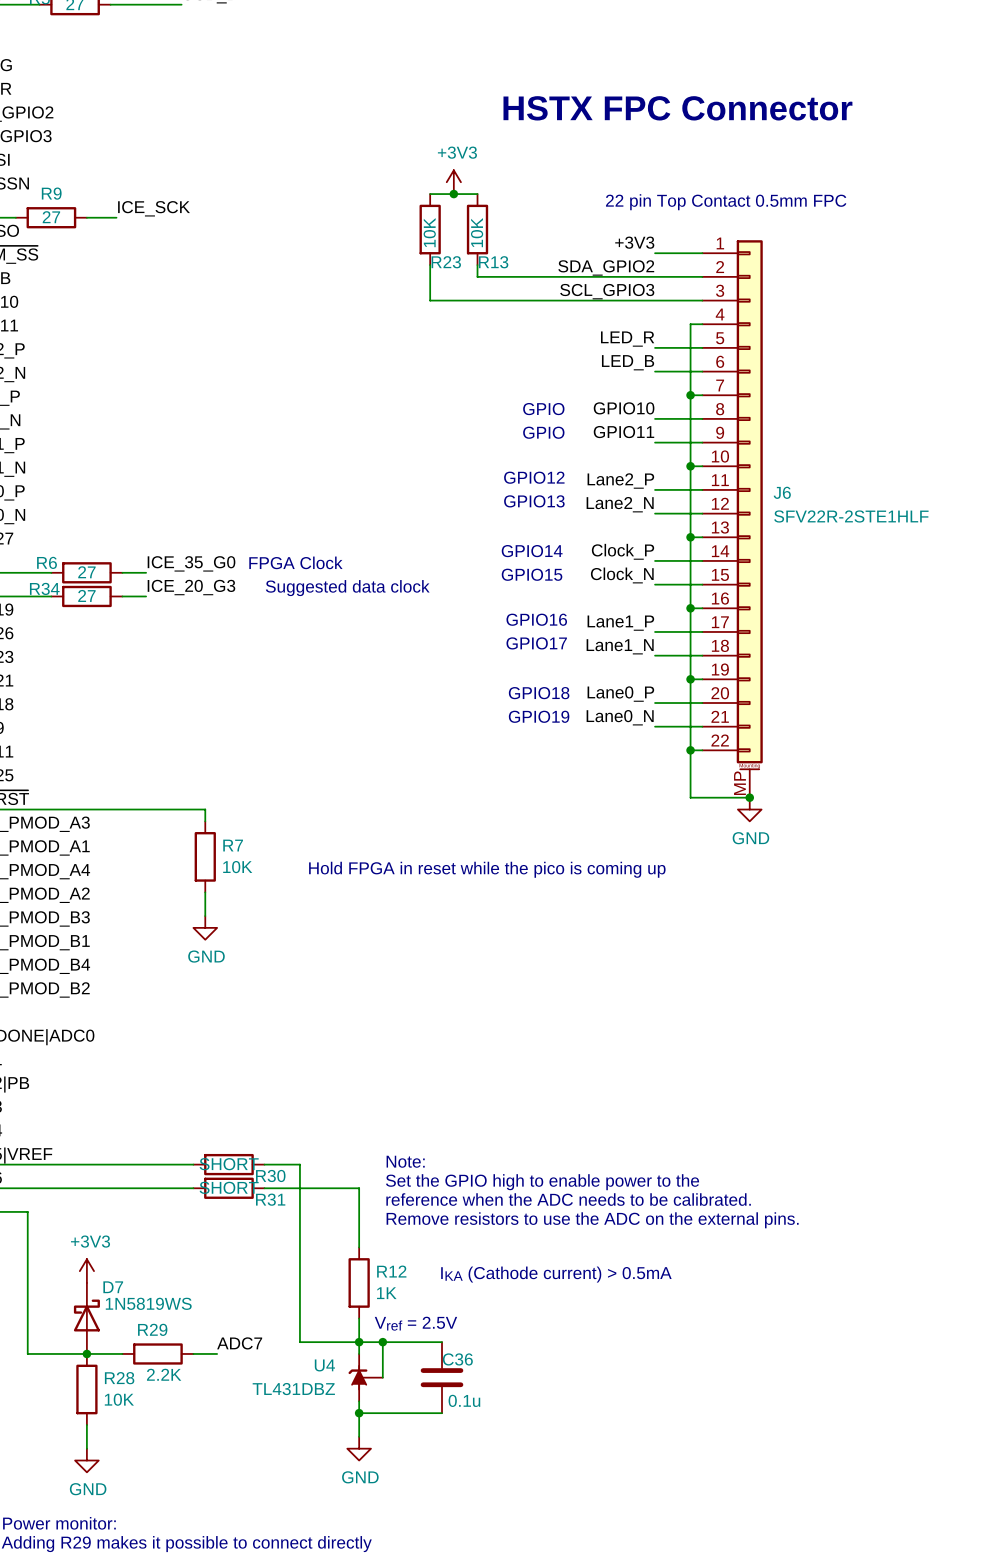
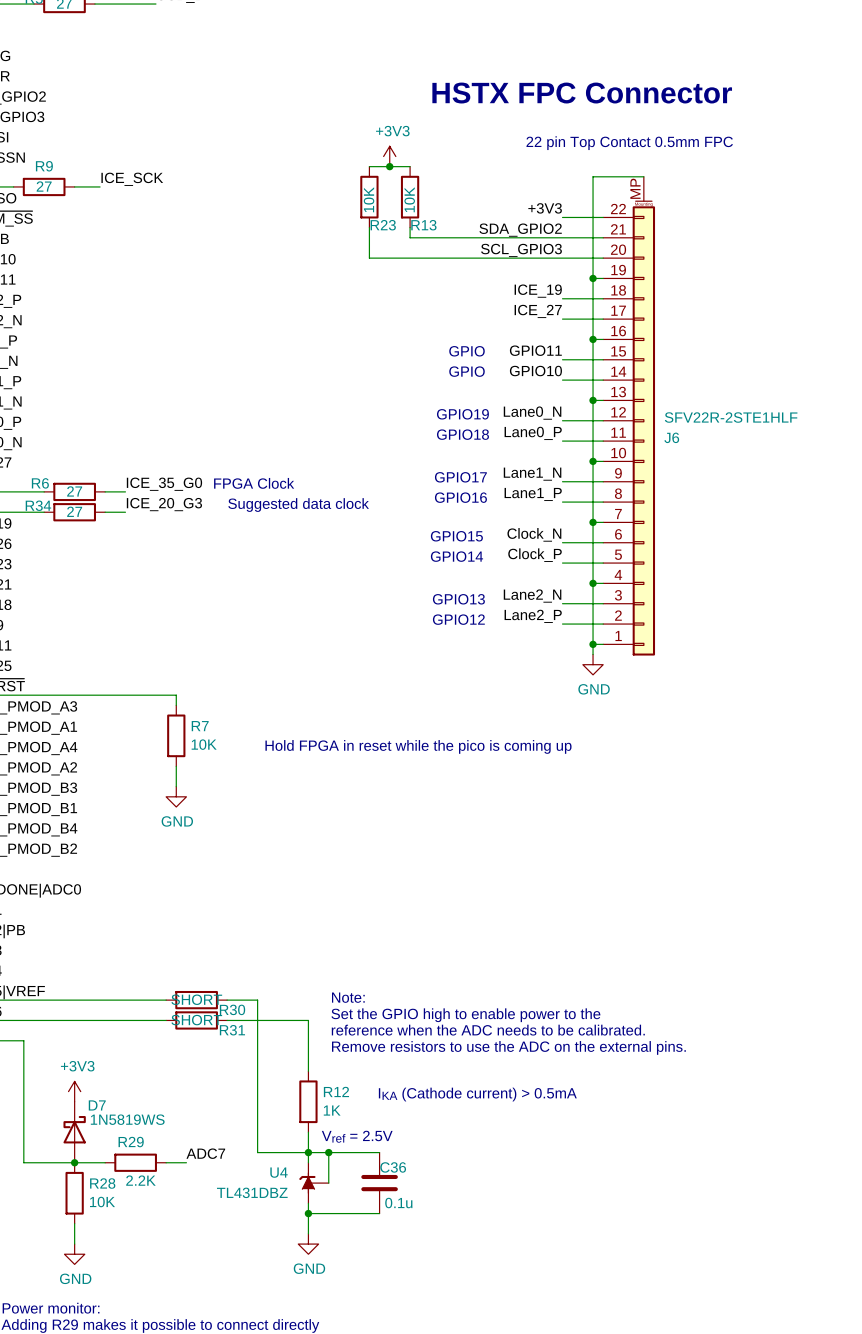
text position: 22 pin Top Contact 0.5mm FPC (726, 202) -> 22 pin Top Contact 0.5mm FPC (629, 143)
wire: none -> (643, 176) (593, 176) (593, 278)
junction: none -> (593, 278)
label: LED_R (627, 339) -> ICE_19 (538, 291)
label: LED_B (628, 362) -> ICE_27 (538, 311)
label: GPIO10 (624, 408) -> GPIO11 (535, 350)
label: GPIO11 (623, 432) -> GPIO10 (535, 371)
text: GPIO12 (534, 477) -> GPIO19 (462, 414)
label: Lane2_P (620, 481) -> Lane0_N (532, 413)
text position: GPIO13 (534, 501) -> GPIO13 (458, 599)
label: Lane2_N (620, 504) -> Lane0_P (533, 433)
J6 flip: as is (749, 505) -> up-down (643, 428)
text position: GPIO14 (532, 551) -> GPIO14 (456, 556)
label: Clock_P (623, 551) -> Lane1_N (532, 474)
text position: GPIO15 (532, 574) -> GPIO15 (456, 536)
label: Clock_N (622, 575) -> Lane1_P (533, 494)
text position: GPIO16 (536, 619) -> GPIO16 (460, 497)
label: Lane1_P (620, 623) -> Clock_N (534, 534)
text position: GPIO17 (536, 643) -> GPIO17 (460, 477)
label: Lane1_N (620, 646) -> Clock_P (535, 555)
text position: GPIO18 (539, 693) -> GPIO18 (462, 434)
label: Lane0_P (620, 694) -> Lane2_N (532, 596)
text: GPIO19 (539, 716) -> GPIO12 (458, 619)
label: Lane0_N (620, 717) -> Lane2_P (533, 616)
wire: (690, 762) (690, 797) (749, 797) -> none
junction: (749, 797) -> none
power symbol position: GND (749, 809) -> GND (593, 664)

